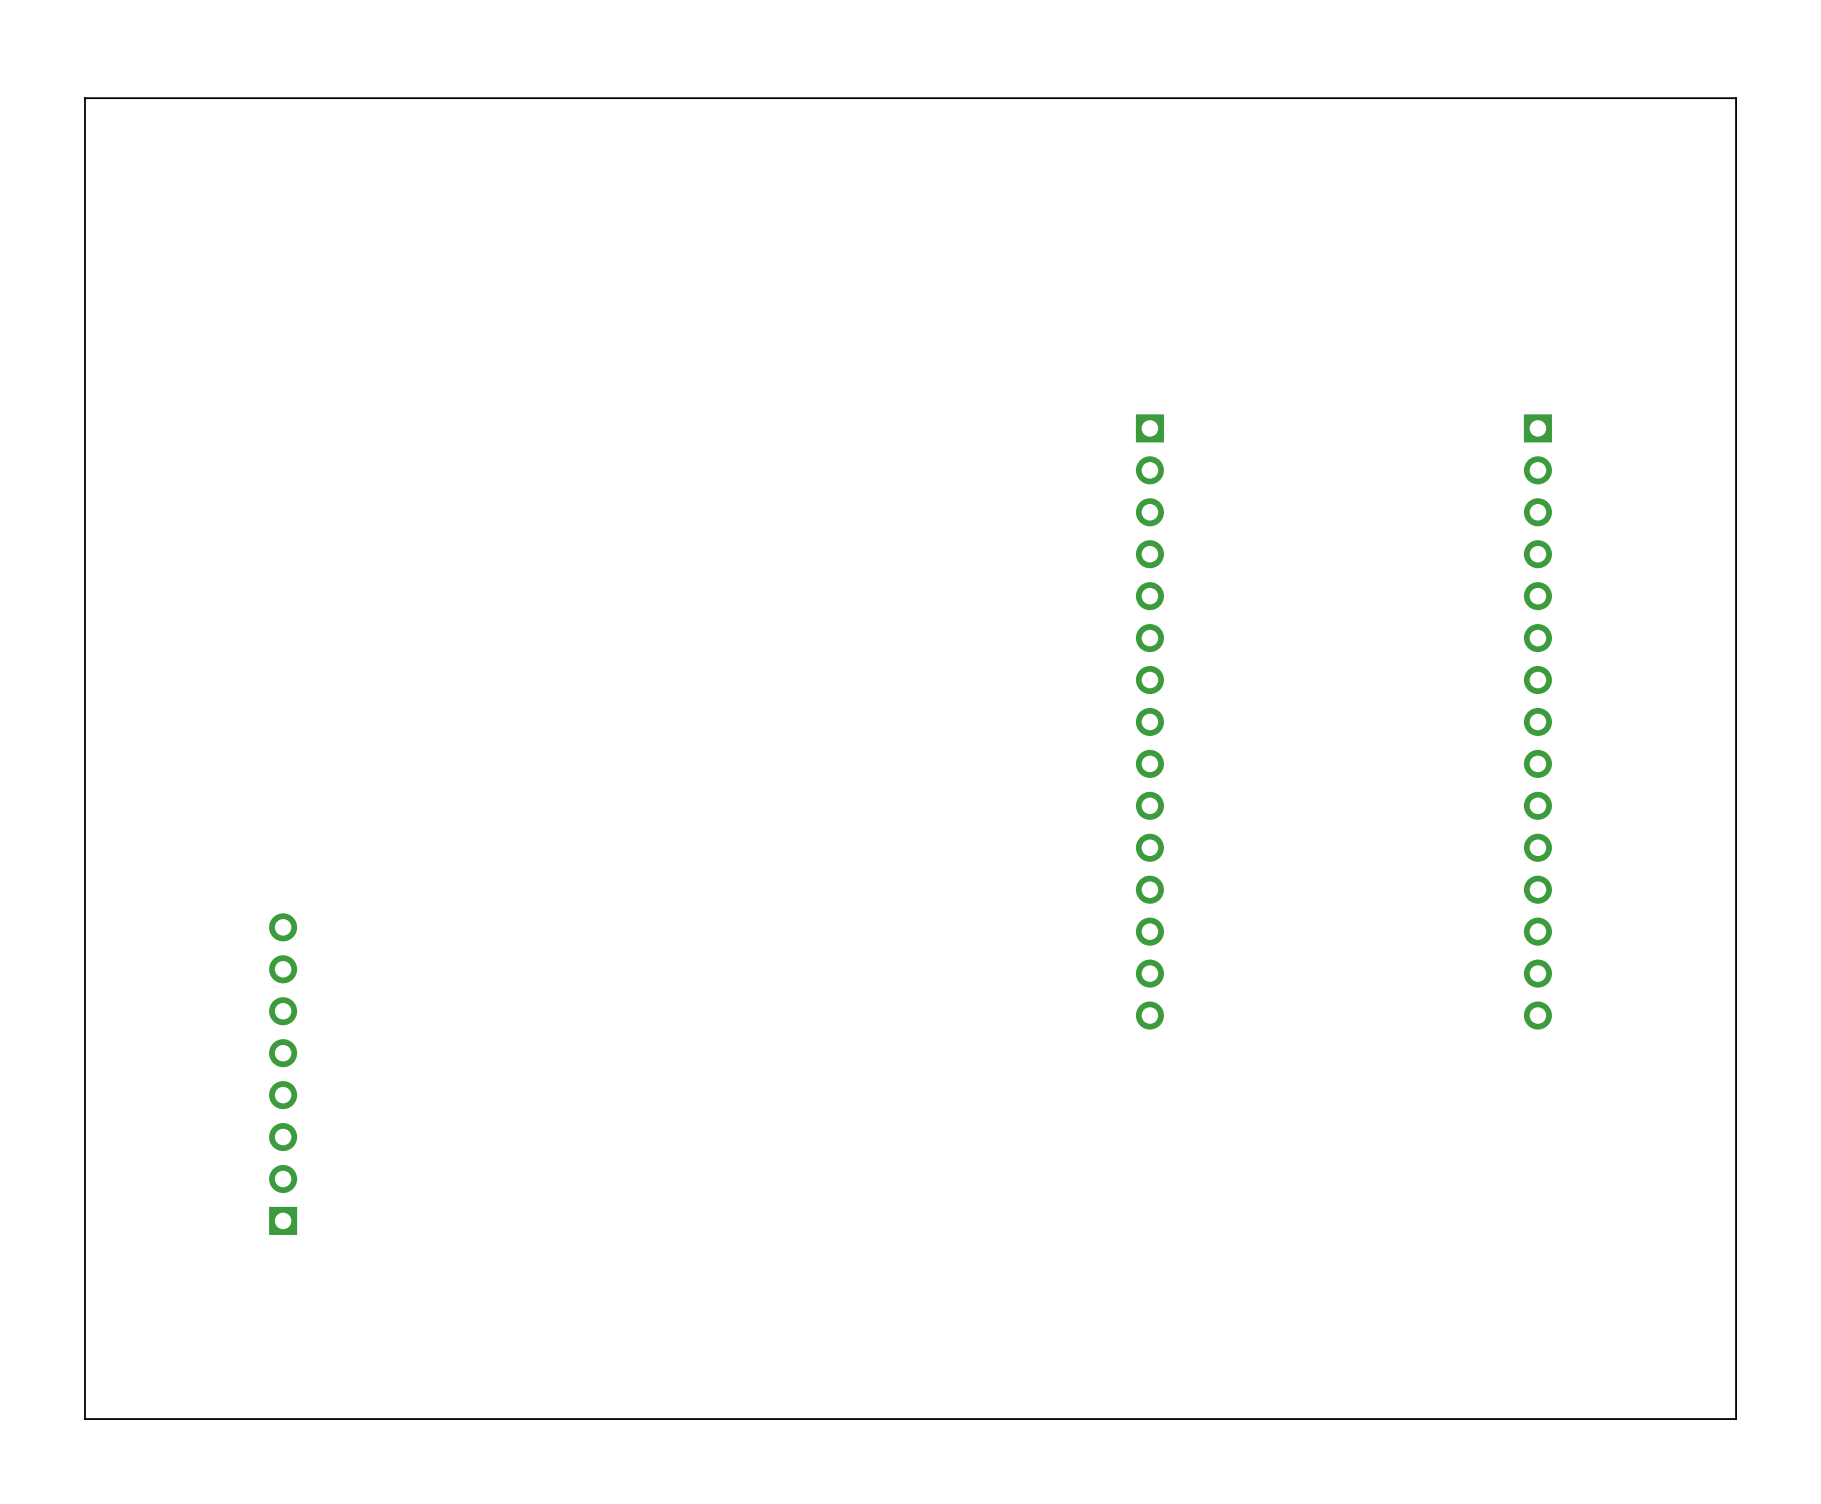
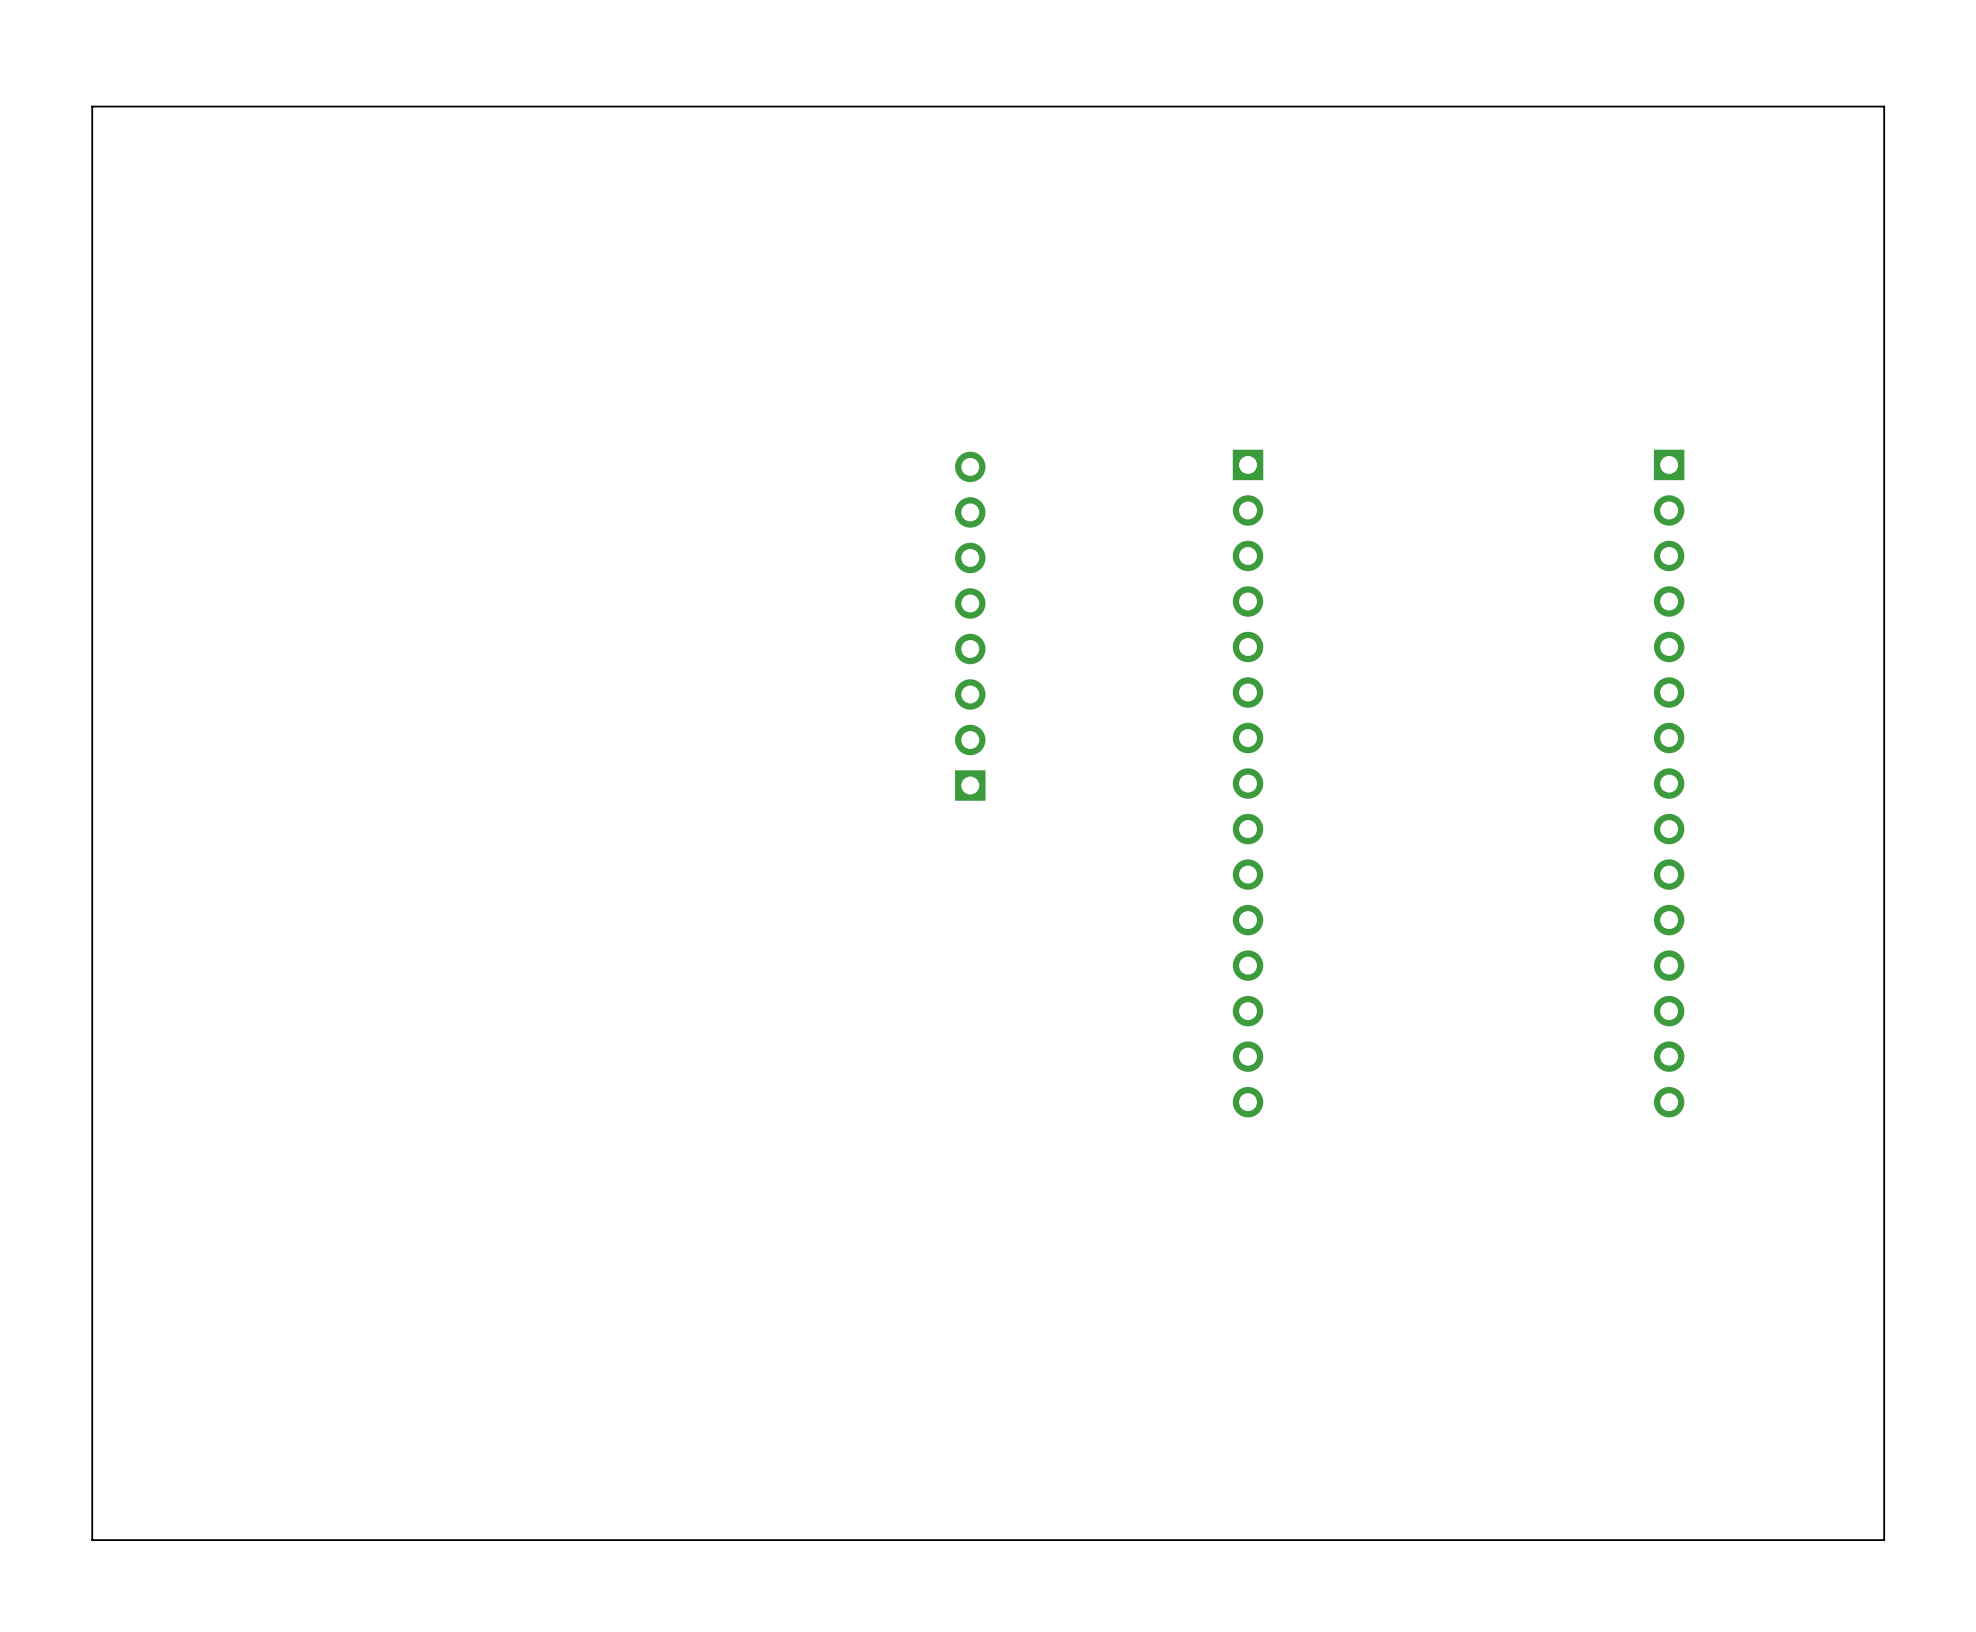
part: none -> (970, 626)
part: (283, 1074) -> none

